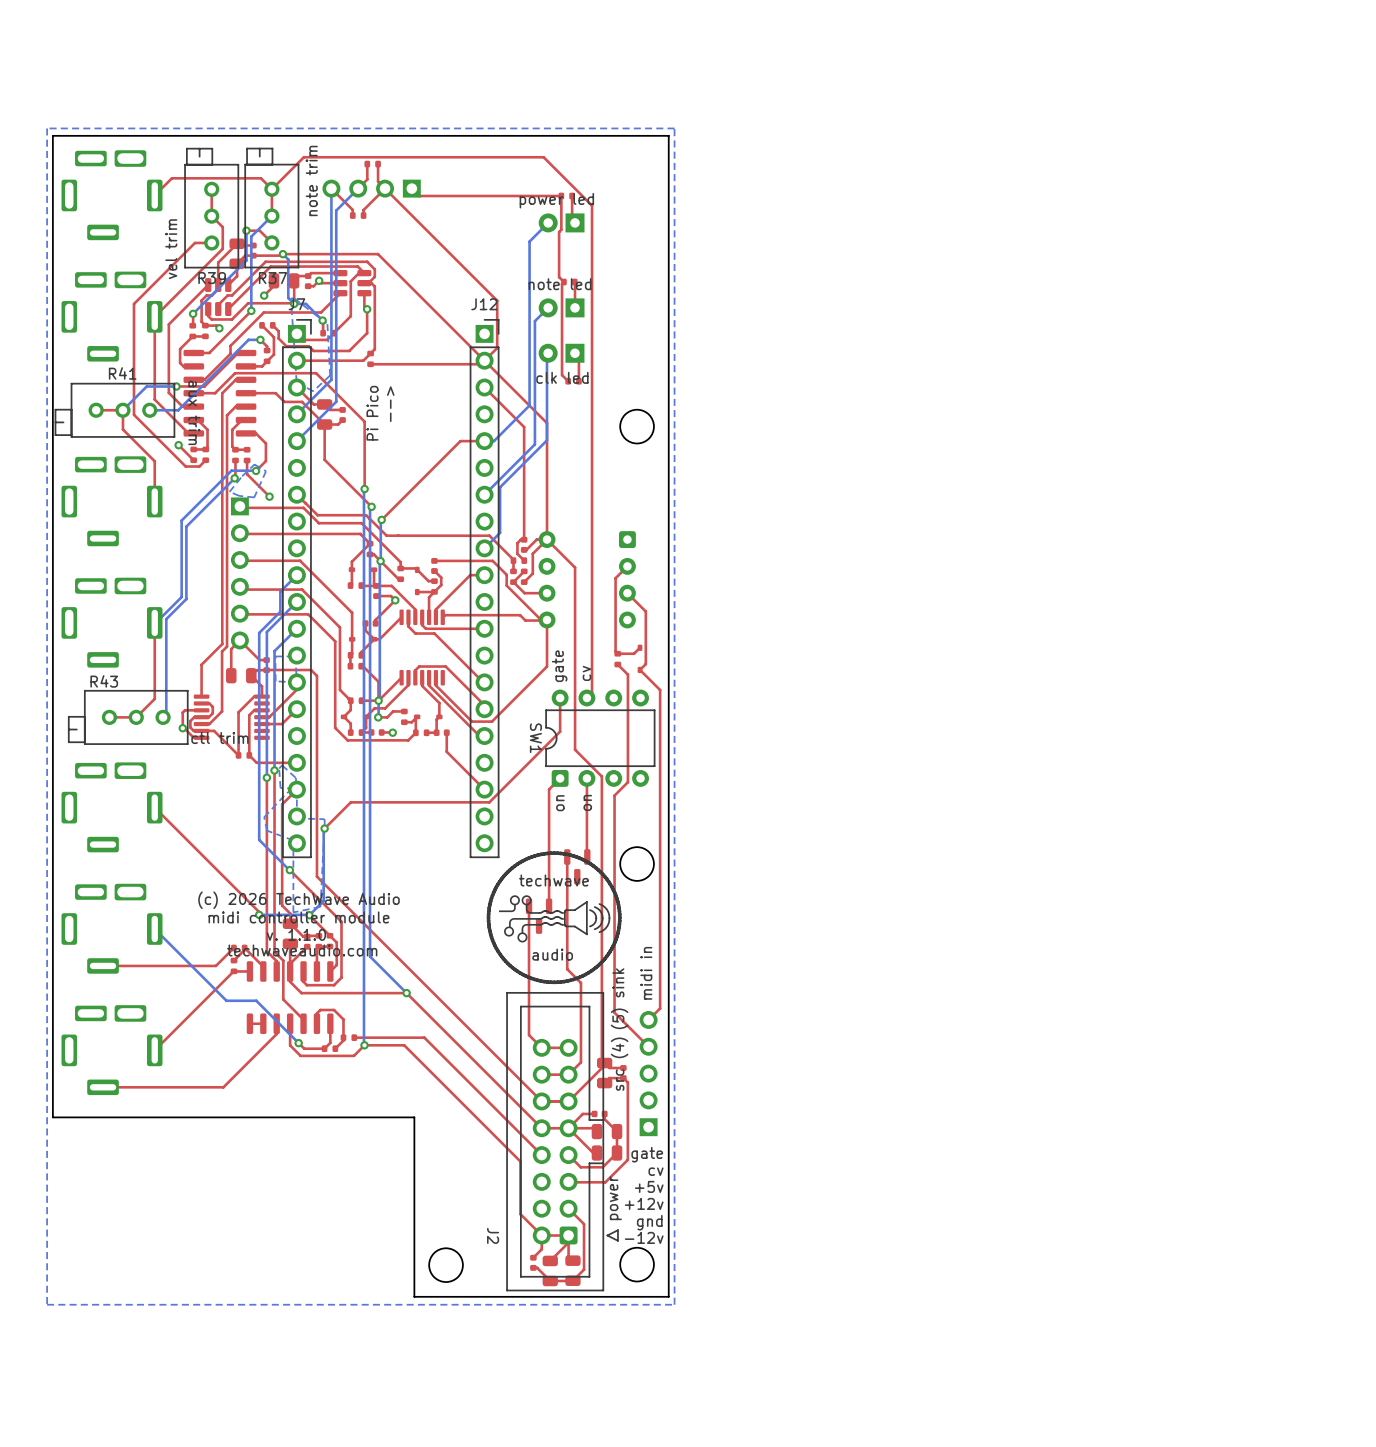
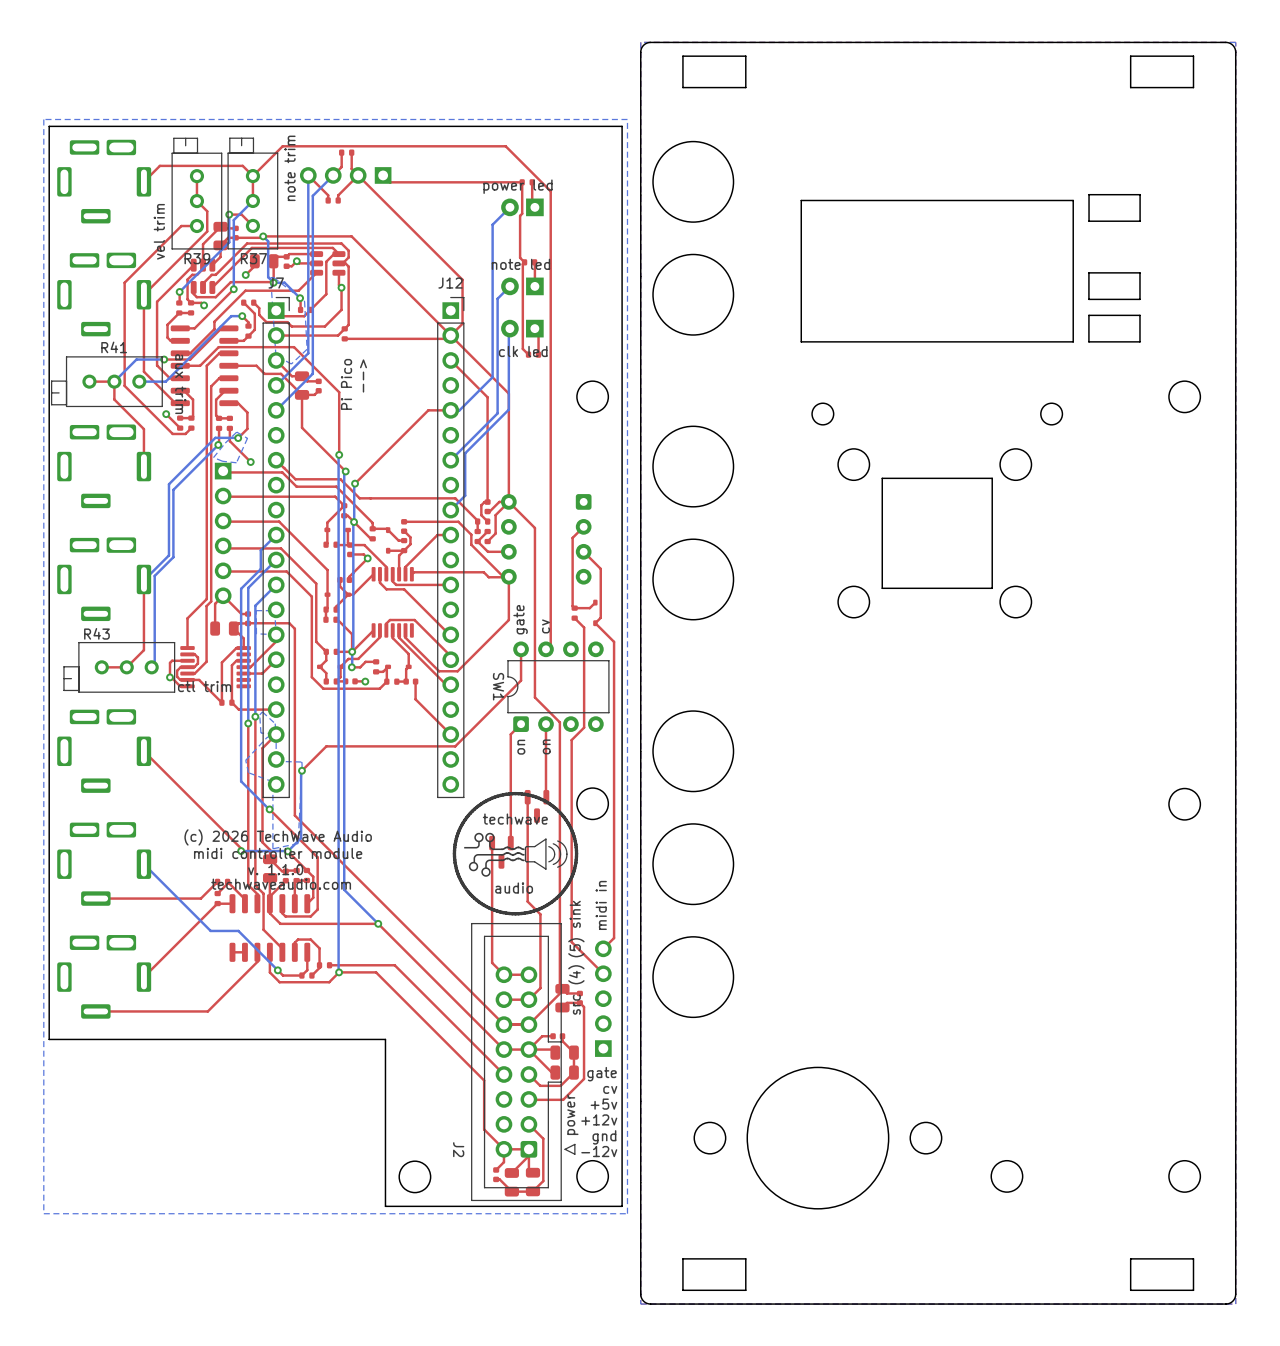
board edge: none -> (1225, 42) (650, 42) (645, 43) (641, 47) (640, 1294) (642, 1299) (646, 1303) (1225, 1304) (1231, 1302) (1234, 1298) (1235, 52) (1232, 45) (1225, 42)
board edge: none -> (745, 56) (682, 56) (682, 87) (745, 87) (745, 56)
board edge: none -> (1193, 56) (1130, 56) (1130, 87) (1193, 87) (1193, 56)
round board edge: none -> [652, 140, 735, 223]
board edge: none -> (1140, 194) (1089, 194) (1089, 221) (1140, 221) (1140, 194)
board edge: none -> (1073, 200) (801, 200) (801, 341) (1073, 341) (1073, 200)
round board edge: none -> [652, 253, 735, 336]
board edge: none -> (1139, 272) (1088, 272) (1088, 299) (1139, 299) (1139, 272)
board edge: none -> (1139, 315) (1139, 341) (1088, 341) (1088, 315) (1139, 315)
round board edge: none -> [1168, 380, 1202, 414]
round board edge: none -> [811, 402, 835, 426]
round board edge: none -> [1040, 402, 1064, 426]
round board edge: none -> [652, 425, 735, 508]
round board edge: none -> [837, 448, 871, 482]
round board edge: none -> [999, 448, 1033, 482]
board edge: none -> (992, 478) (882, 478) (882, 588) (992, 588) (992, 478)
round board edge: none -> [652, 538, 735, 621]
round board edge: none -> [837, 585, 871, 619]
round board edge: none -> [999, 585, 1033, 619]
round board edge: none -> [652, 710, 735, 793]
round board edge: none -> [1168, 787, 1202, 821]
round board edge: none -> [652, 823, 735, 906]
round board edge: none -> [652, 936, 735, 1019]
round board edge: none -> [746, 1066, 890, 1210]
round board edge: none -> [693, 1121, 727, 1155]
round board edge: none -> [909, 1121, 943, 1155]
round board edge: none -> [990, 1159, 1024, 1193]
round board edge: none -> [1168, 1159, 1202, 1193]
board edge: none -> (745, 1258) (682, 1258) (682, 1290) (745, 1290) (745, 1258)
board edge: none -> (1193, 1258) (1193, 1290) (1130, 1290) (1130, 1258) (1193, 1258)

